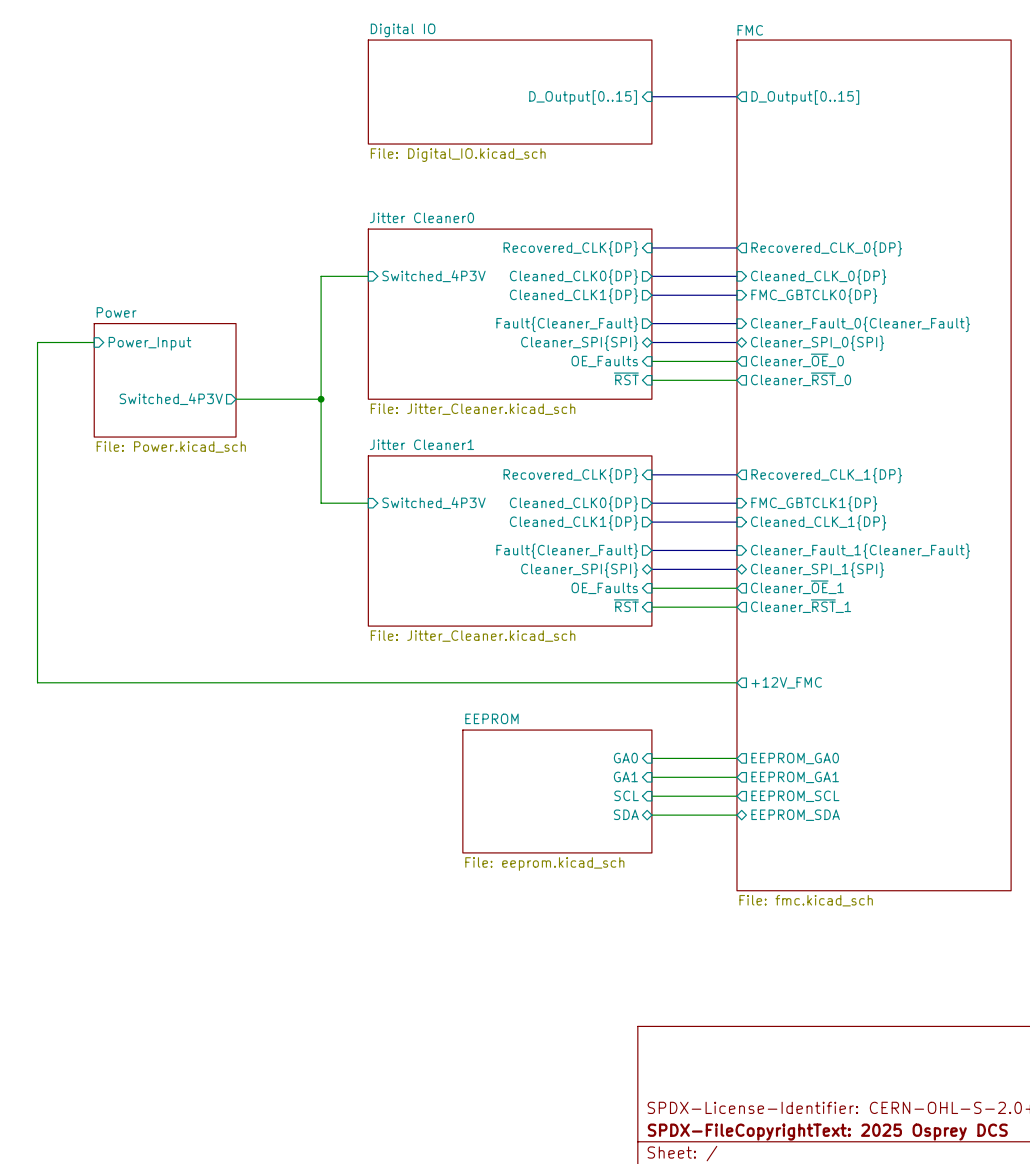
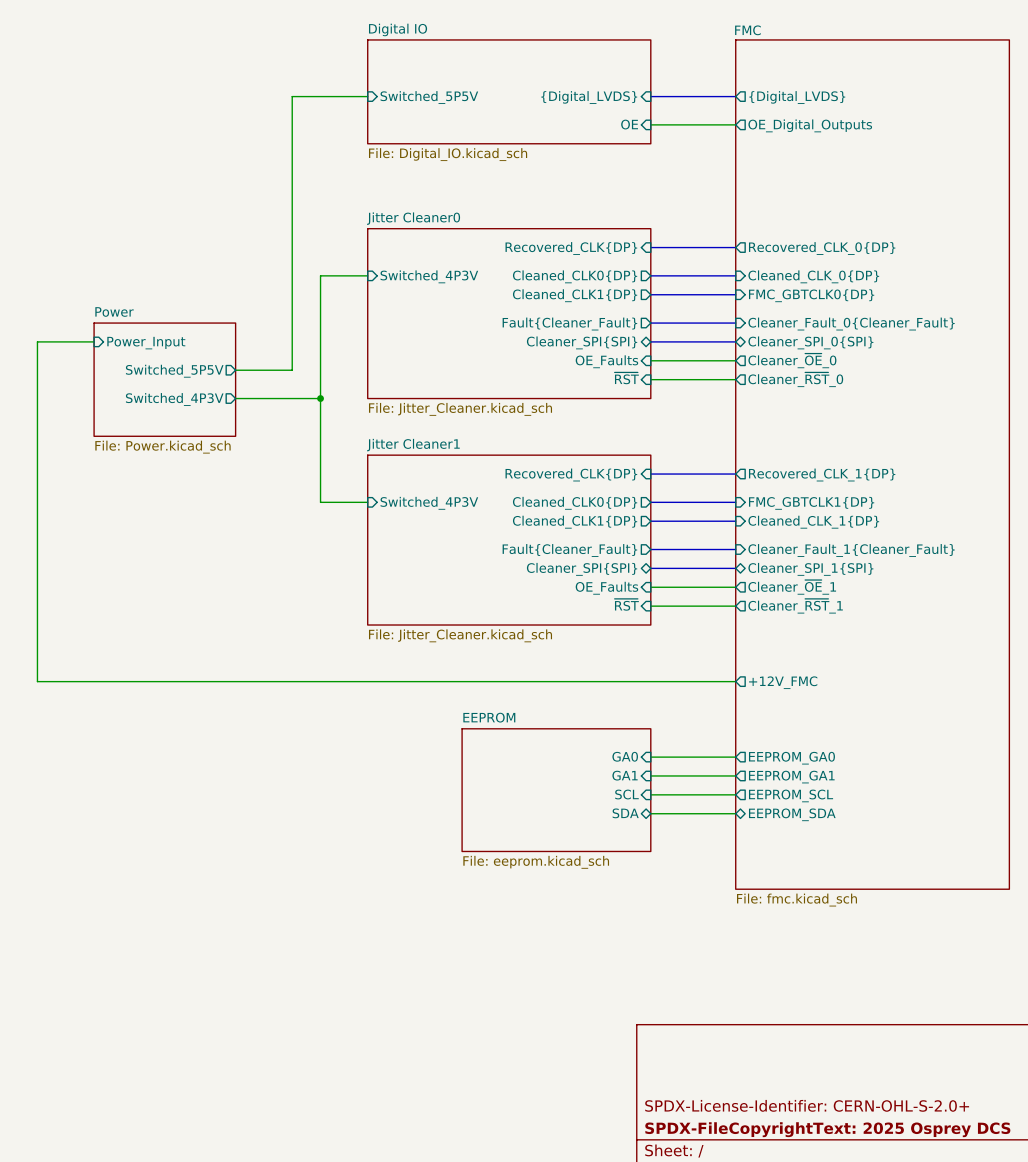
wire: none -> (367, 96) (292, 96) (292, 370) (235, 370)
sheet pin: none -> Switched_5P5V (429, 97)
sheet pin: D_Output[0..15] (583, 97) -> {Digital_LVDS} (589, 97)
sheet pin: D_Output[0..15] (805, 97) -> {Digital_LVDS} (797, 97)
sheet pin: none -> OE (629, 124)
wire: none -> (650, 124) (735, 124)
sheet pin: none -> OE_Digital_Outputs (810, 125)
sheet pin: none -> Switched_5P5V (174, 371)

